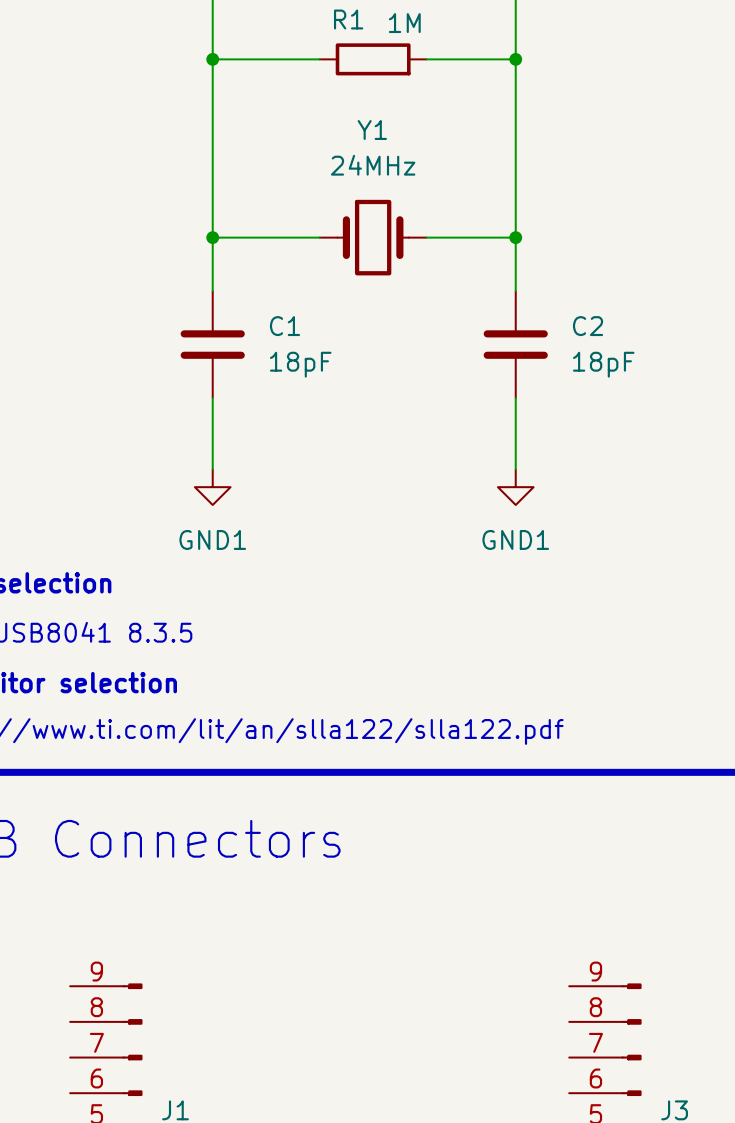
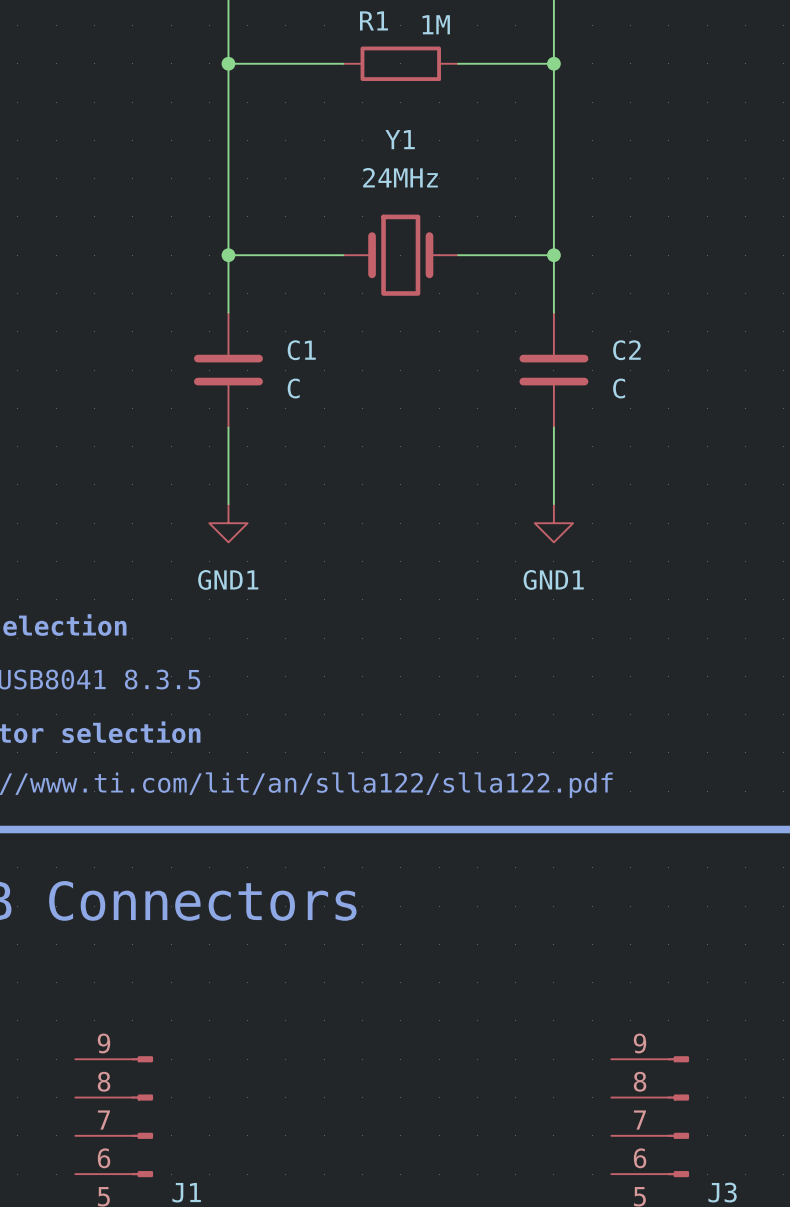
C1 value: 18pF (300, 364) -> C (293, 388)
C2 value: 18pF (603, 364) -> C (619, 388)

